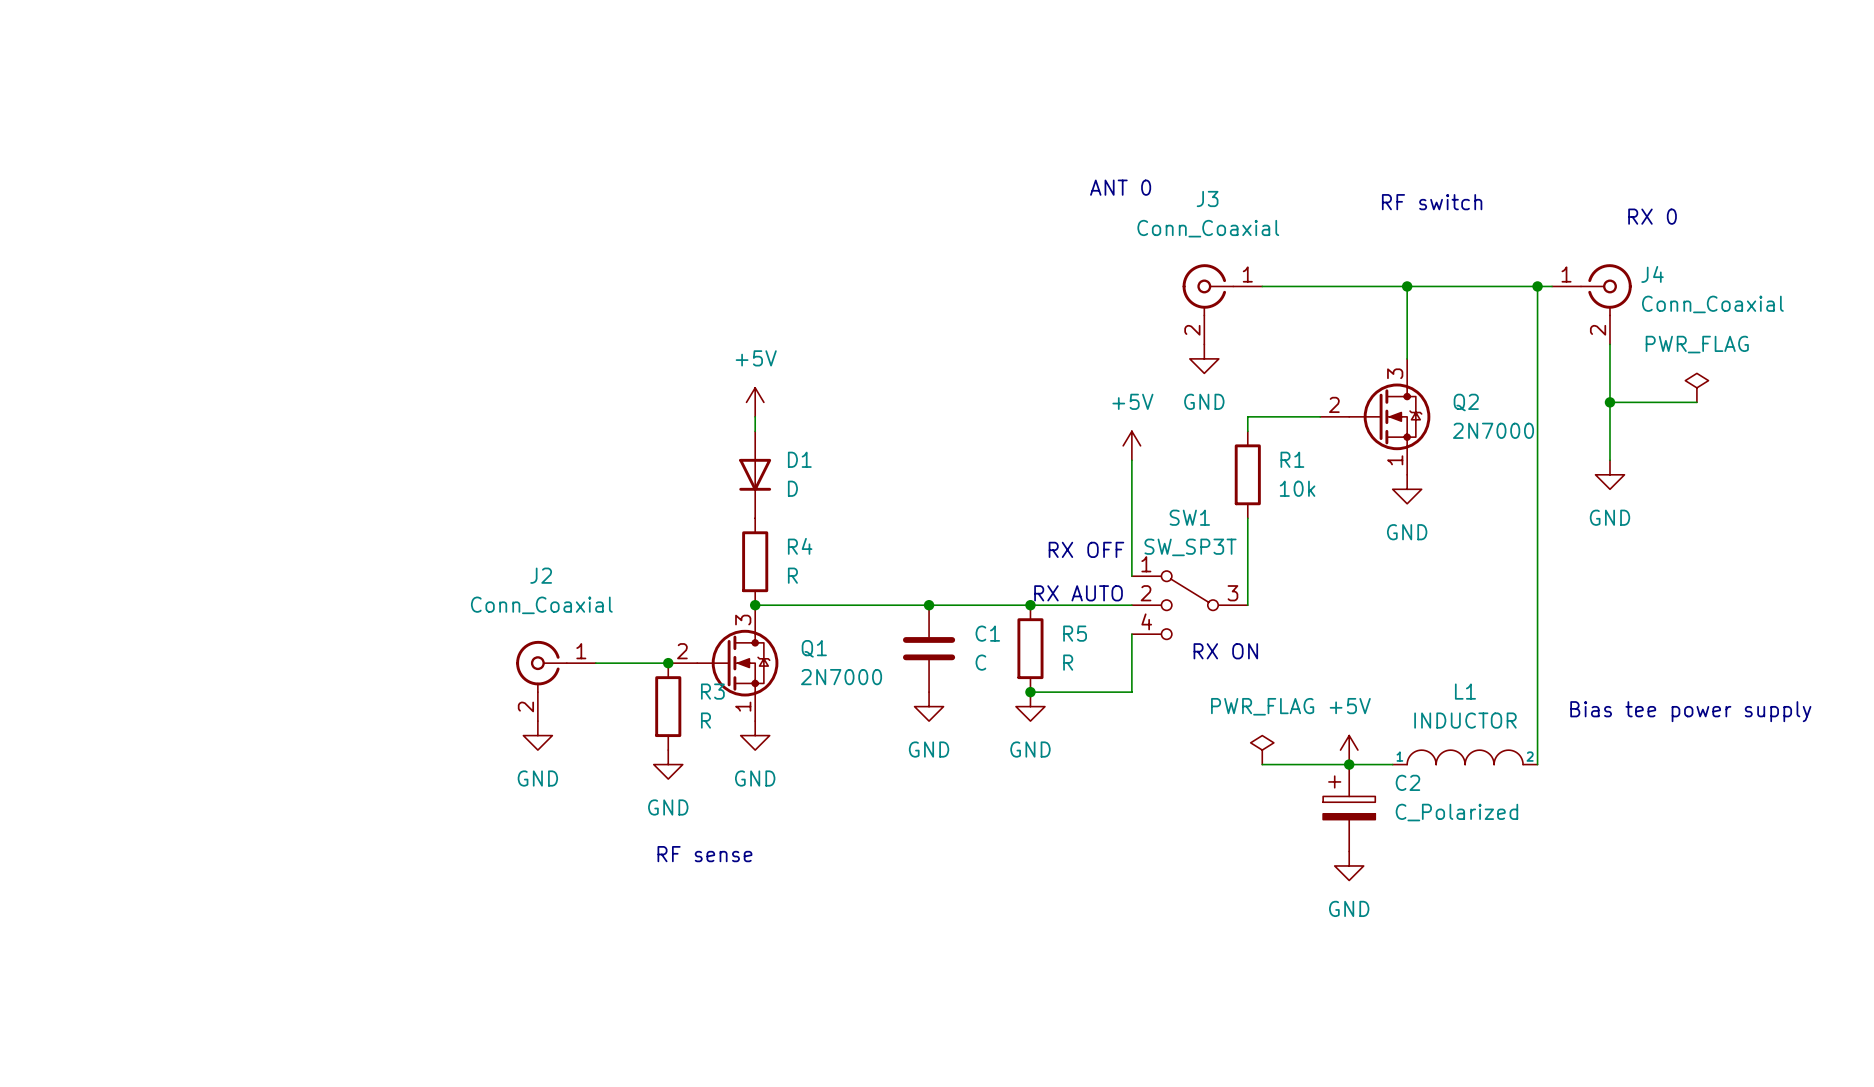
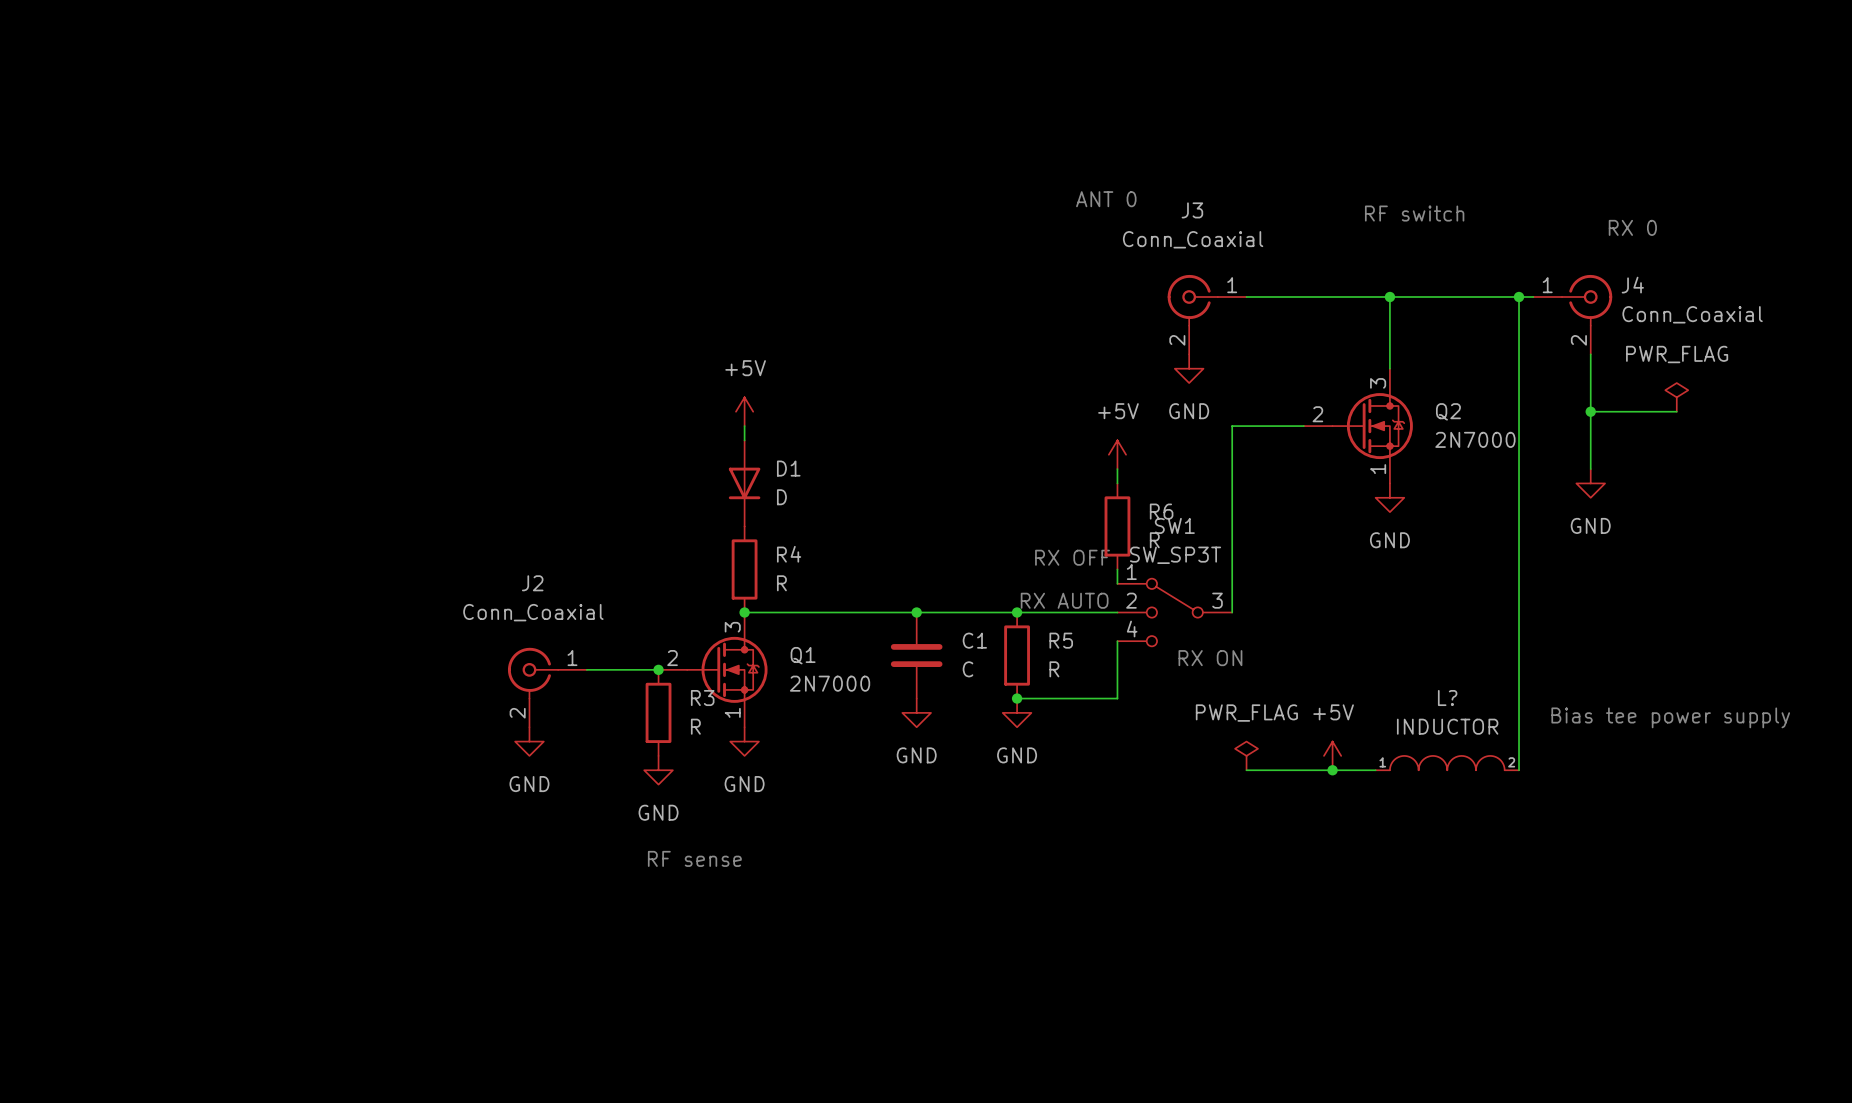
wire: (1131, 474) (1131, 561) -> (1232, 440) (1232, 526)
R1: 10k (1247, 474) -> none
R6: none -> R (1117, 526)
L1: INDUCTOR (1465, 757) -> none
L?: none -> INDUCTOR (1447, 763)
C2: C_Polarized (1349, 808) -> none
power symbol: GND (1349, 865) -> none

